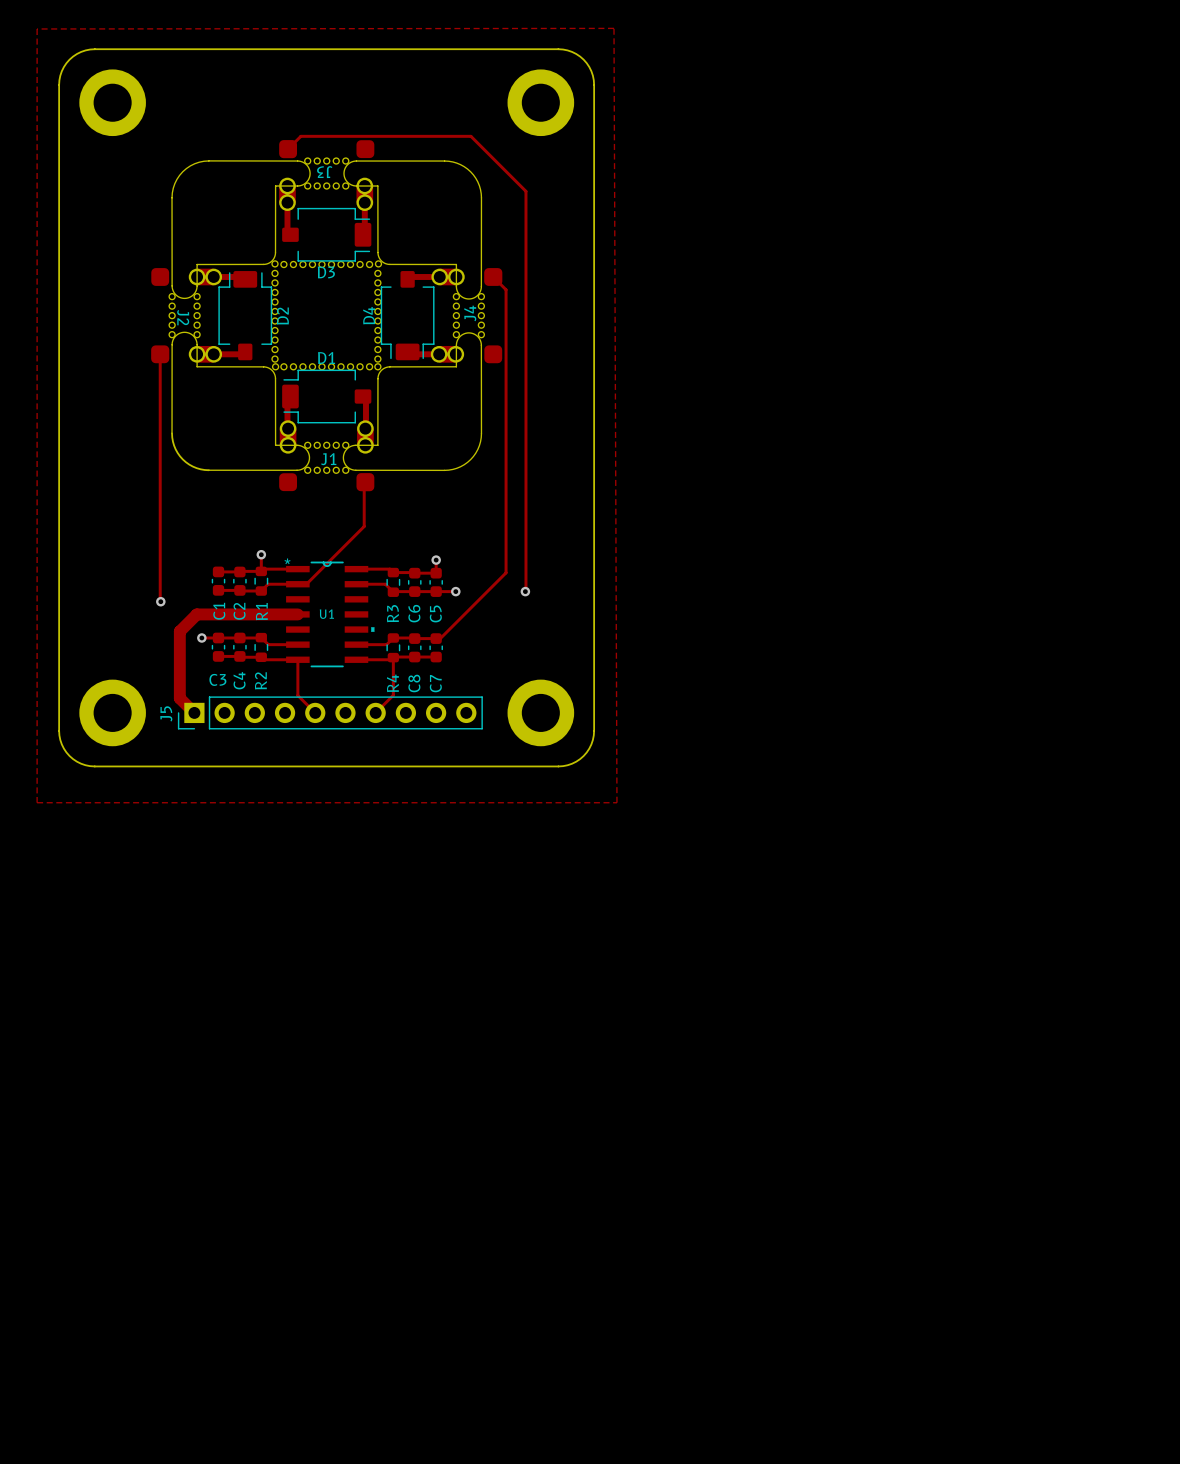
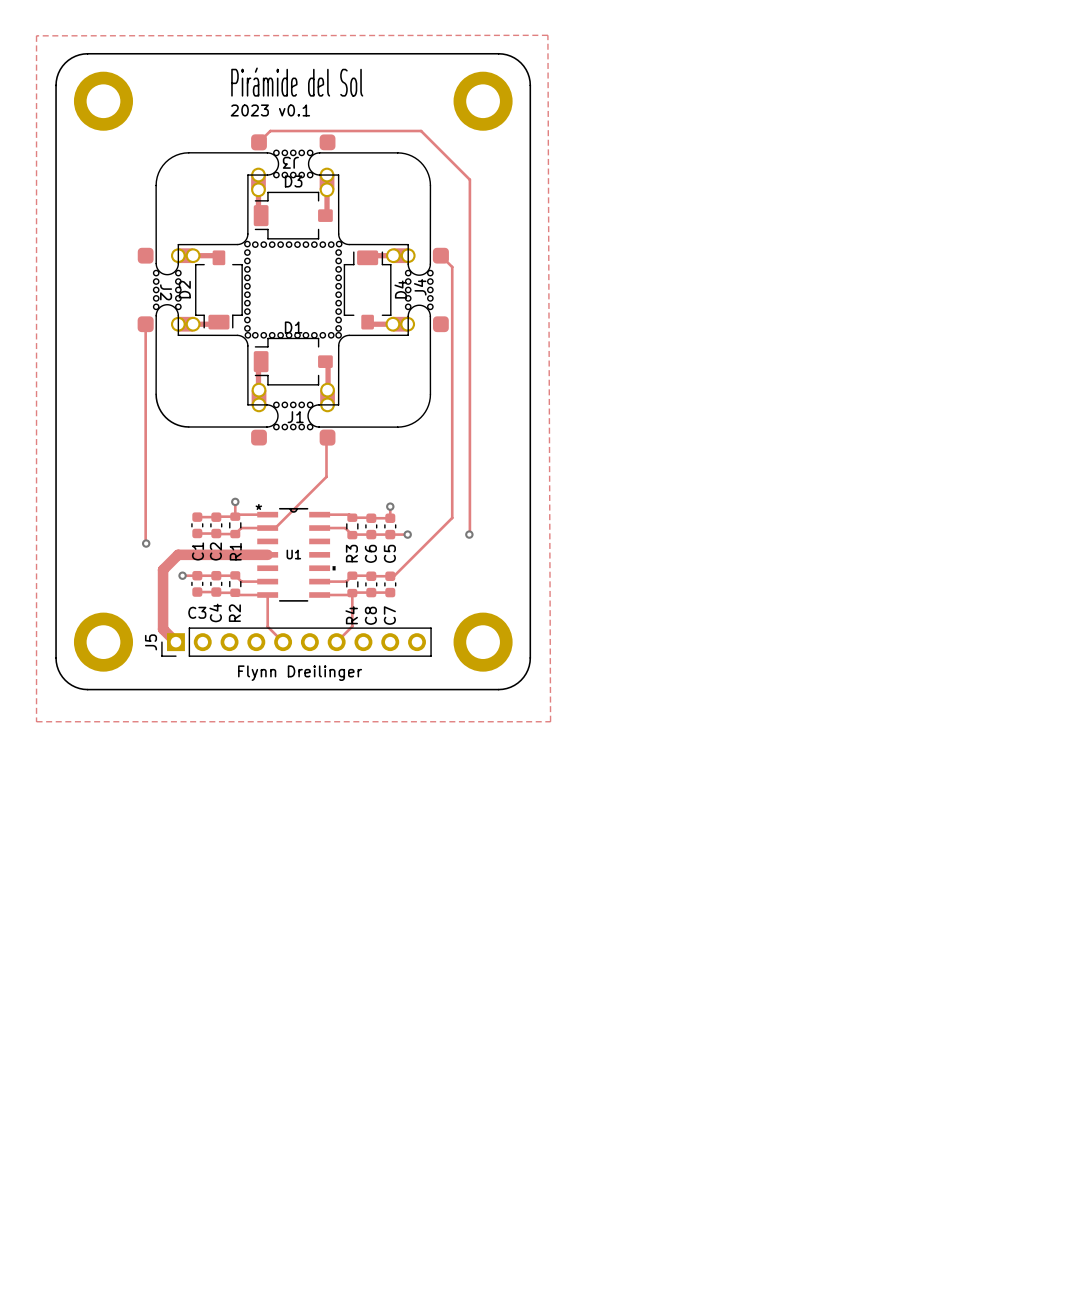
text: none -> Pirámide del Sol (297, 82)
text: none -> 2023 v0.1 (270, 110)
D3 rotation: 0° (326, 234) -> 180° (293, 215)
D2 rotation: 0° (245, 315) -> 180° (218, 289)
D4 rotation: 0° (407, 315) -> 180° (367, 289)
text: none -> Flynn Dreilinger (300, 673)

